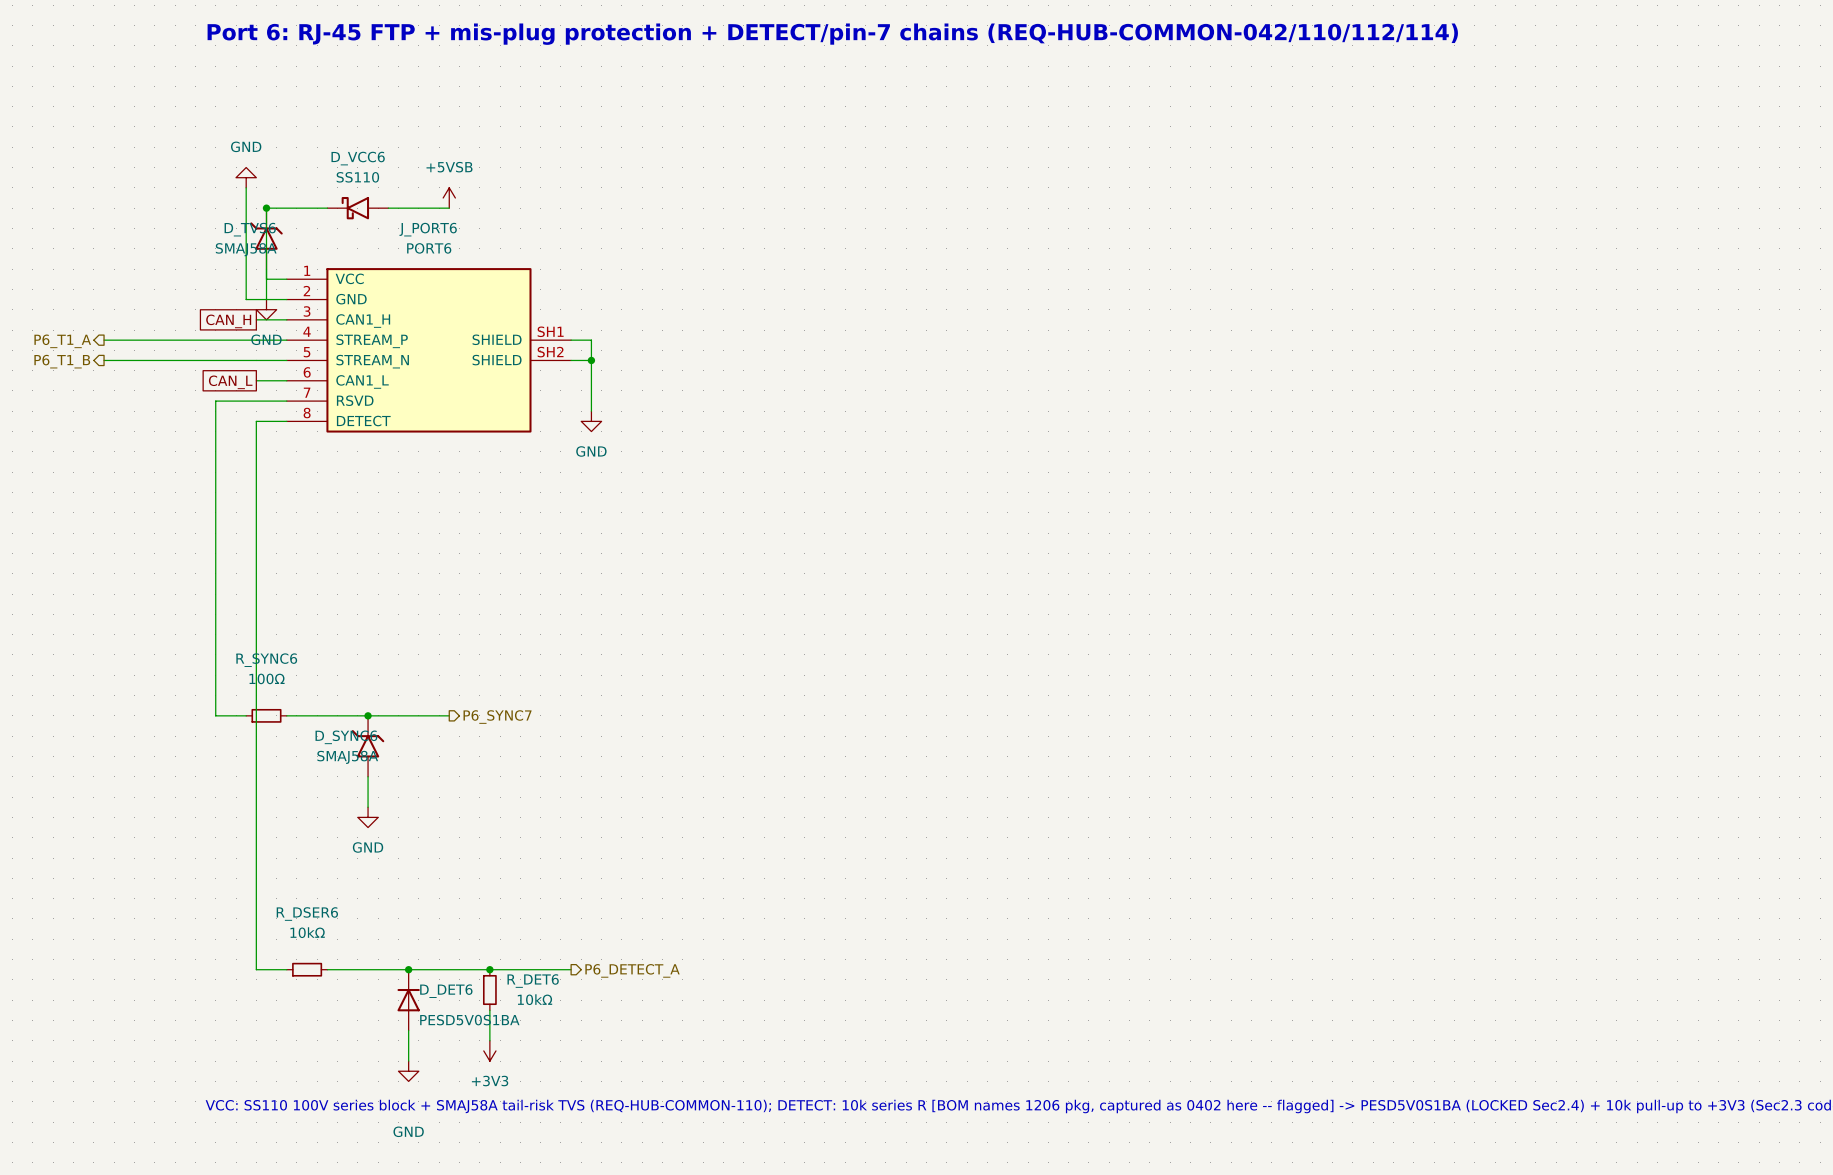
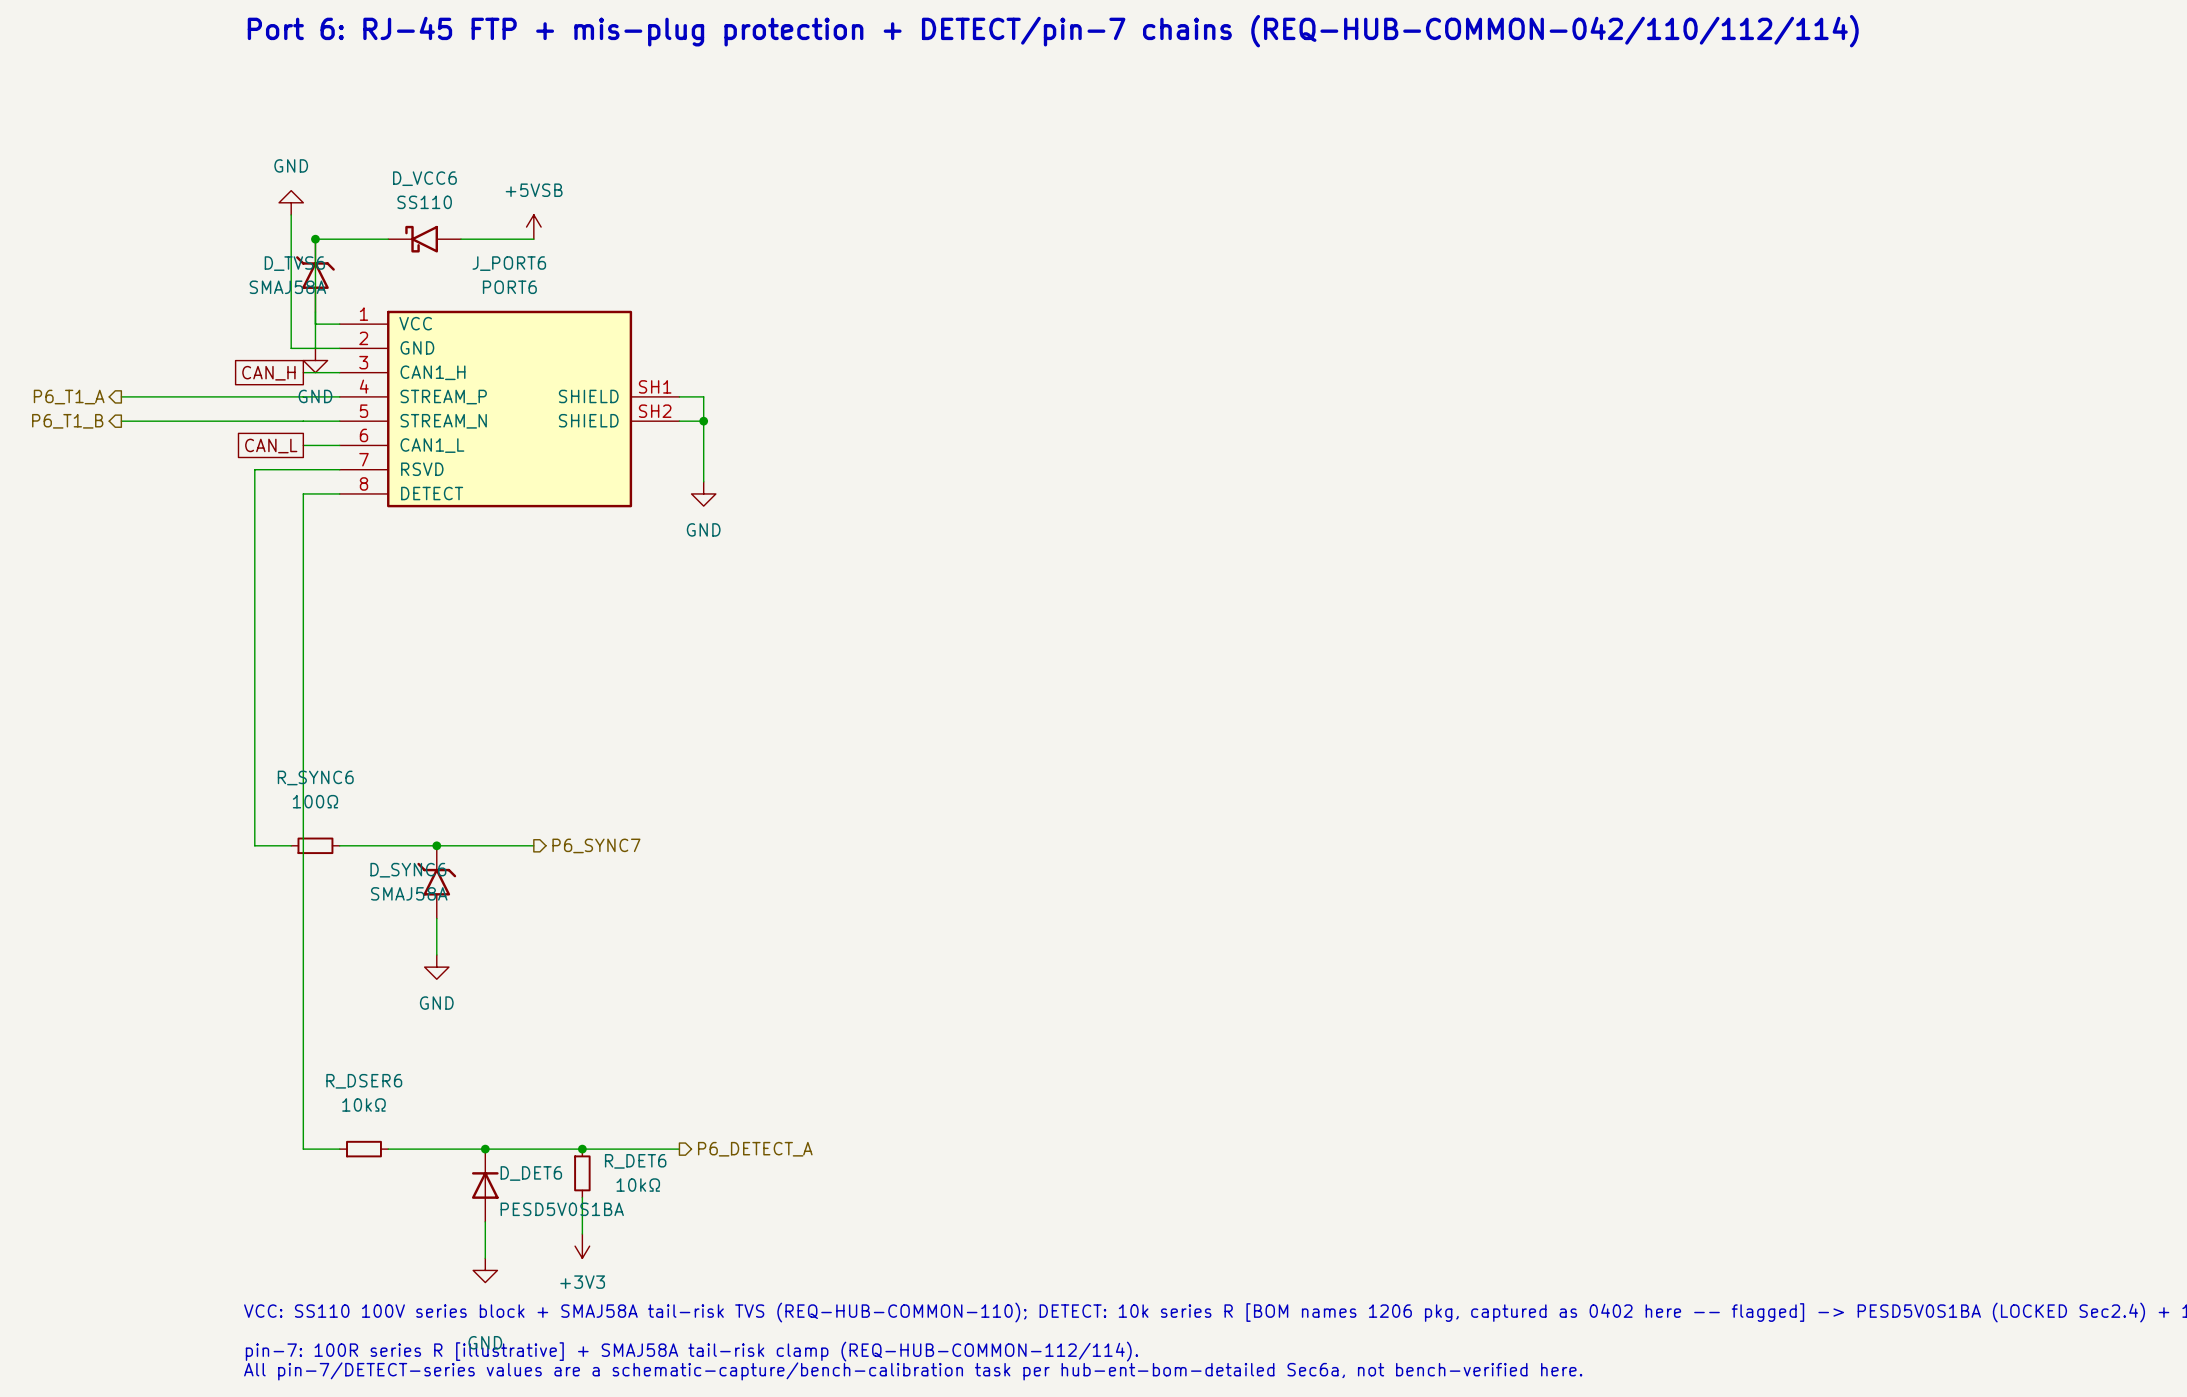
text: none -> pin-7: 100R series R [illustrative] + SMAJ58A tail-risk clamp (REQ-HUB-COMMON-112/114). (691, 1351)
text: none -> All pin-7/DETECT-series values are a schematic-capture/bench-calibration task per hub-ent-bom-detailed Sec6a, not bench-verified here. (913, 1371)

